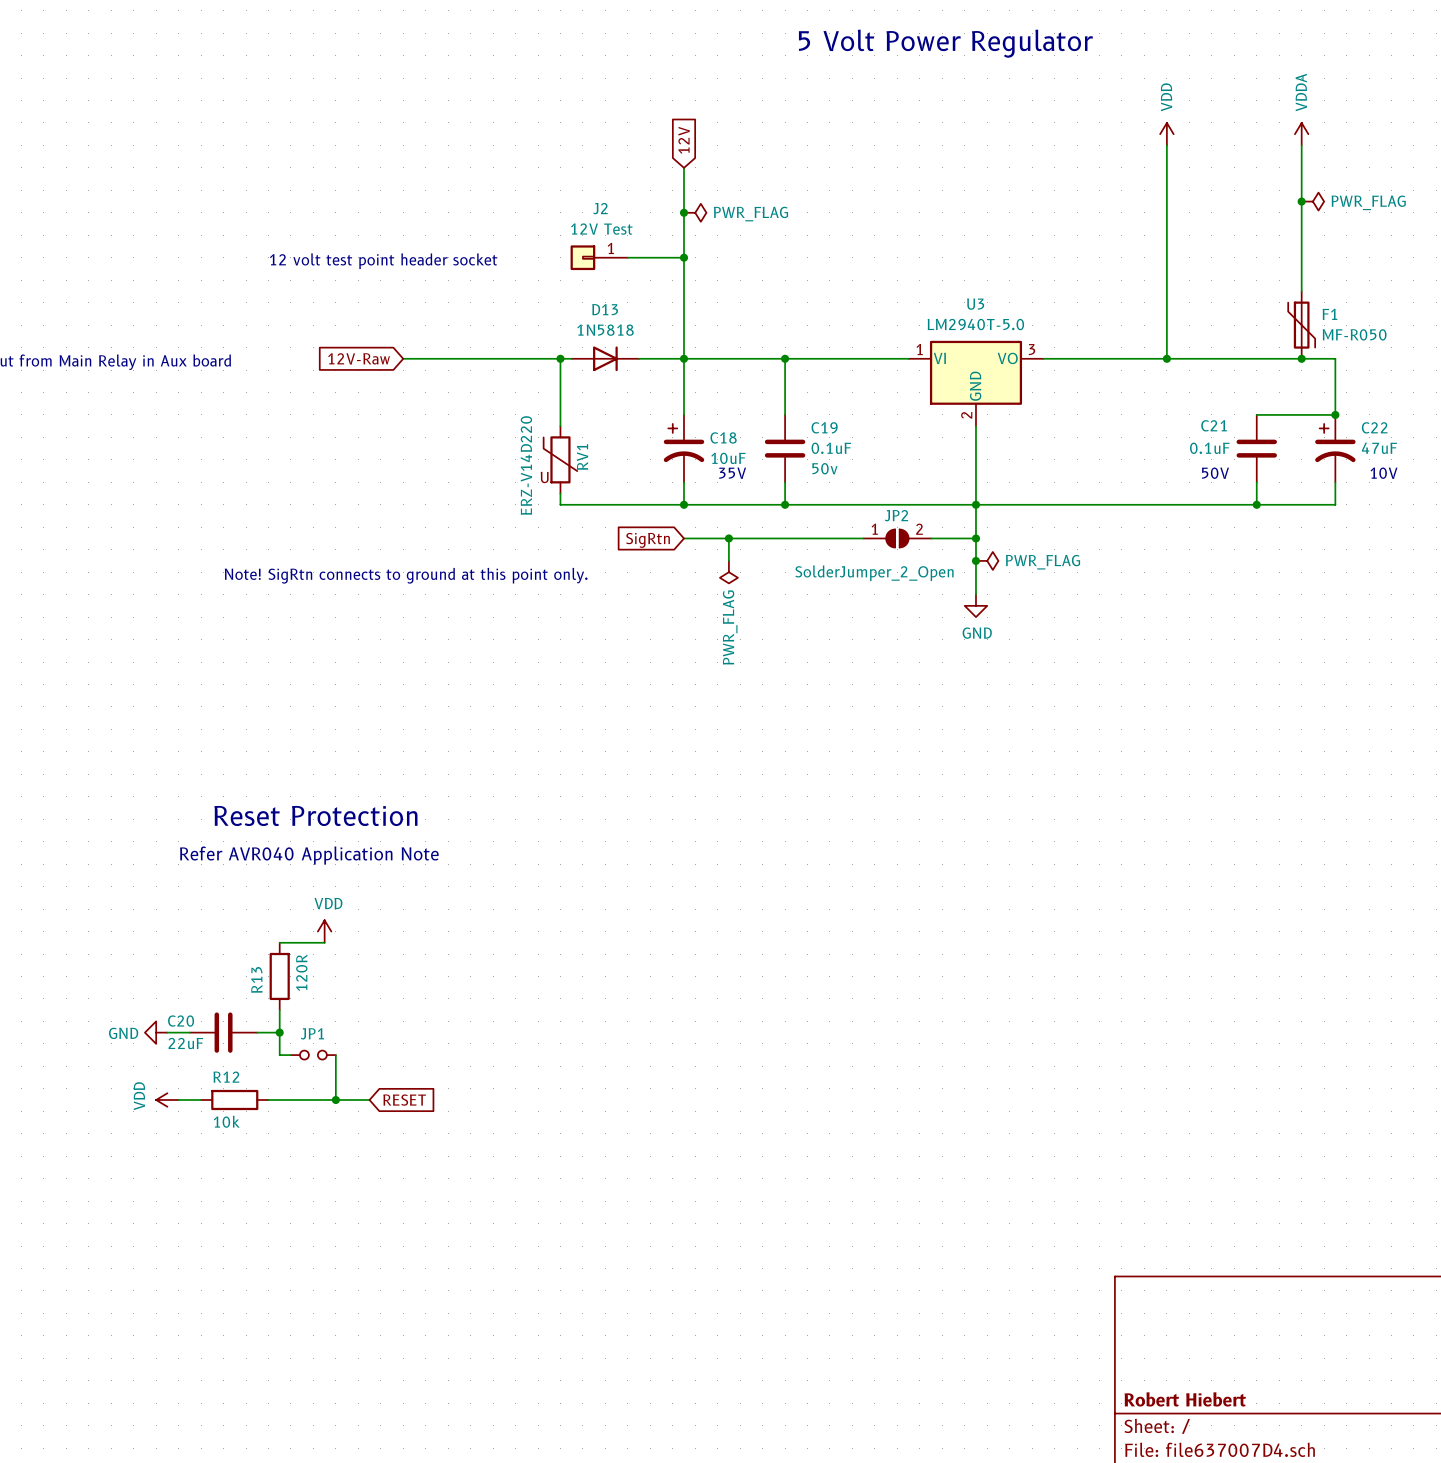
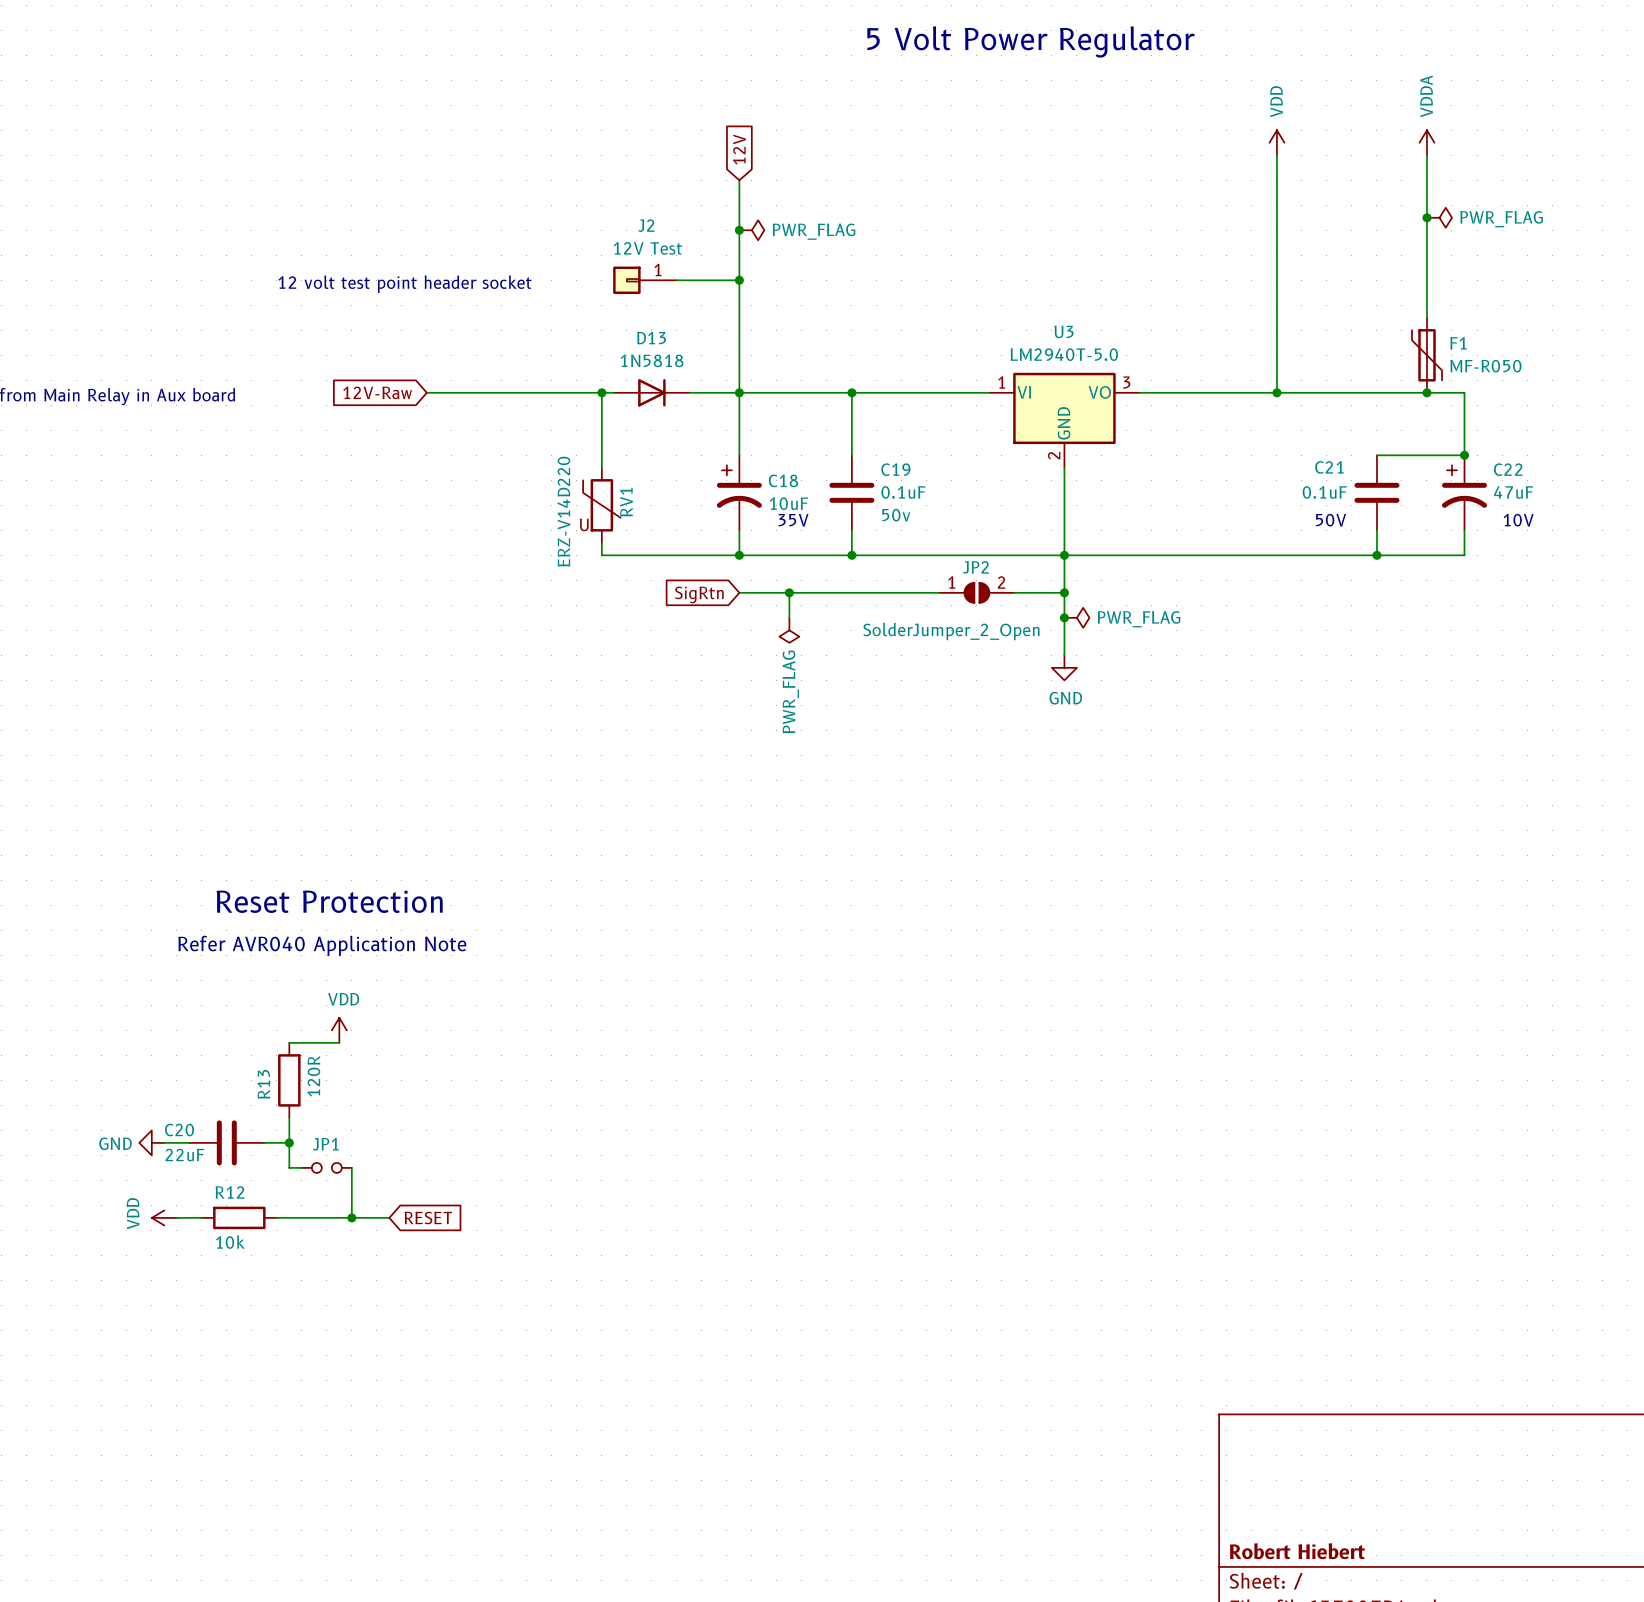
text: Note! SigRtn connects to ground at this point only. (406, 575) -> none

